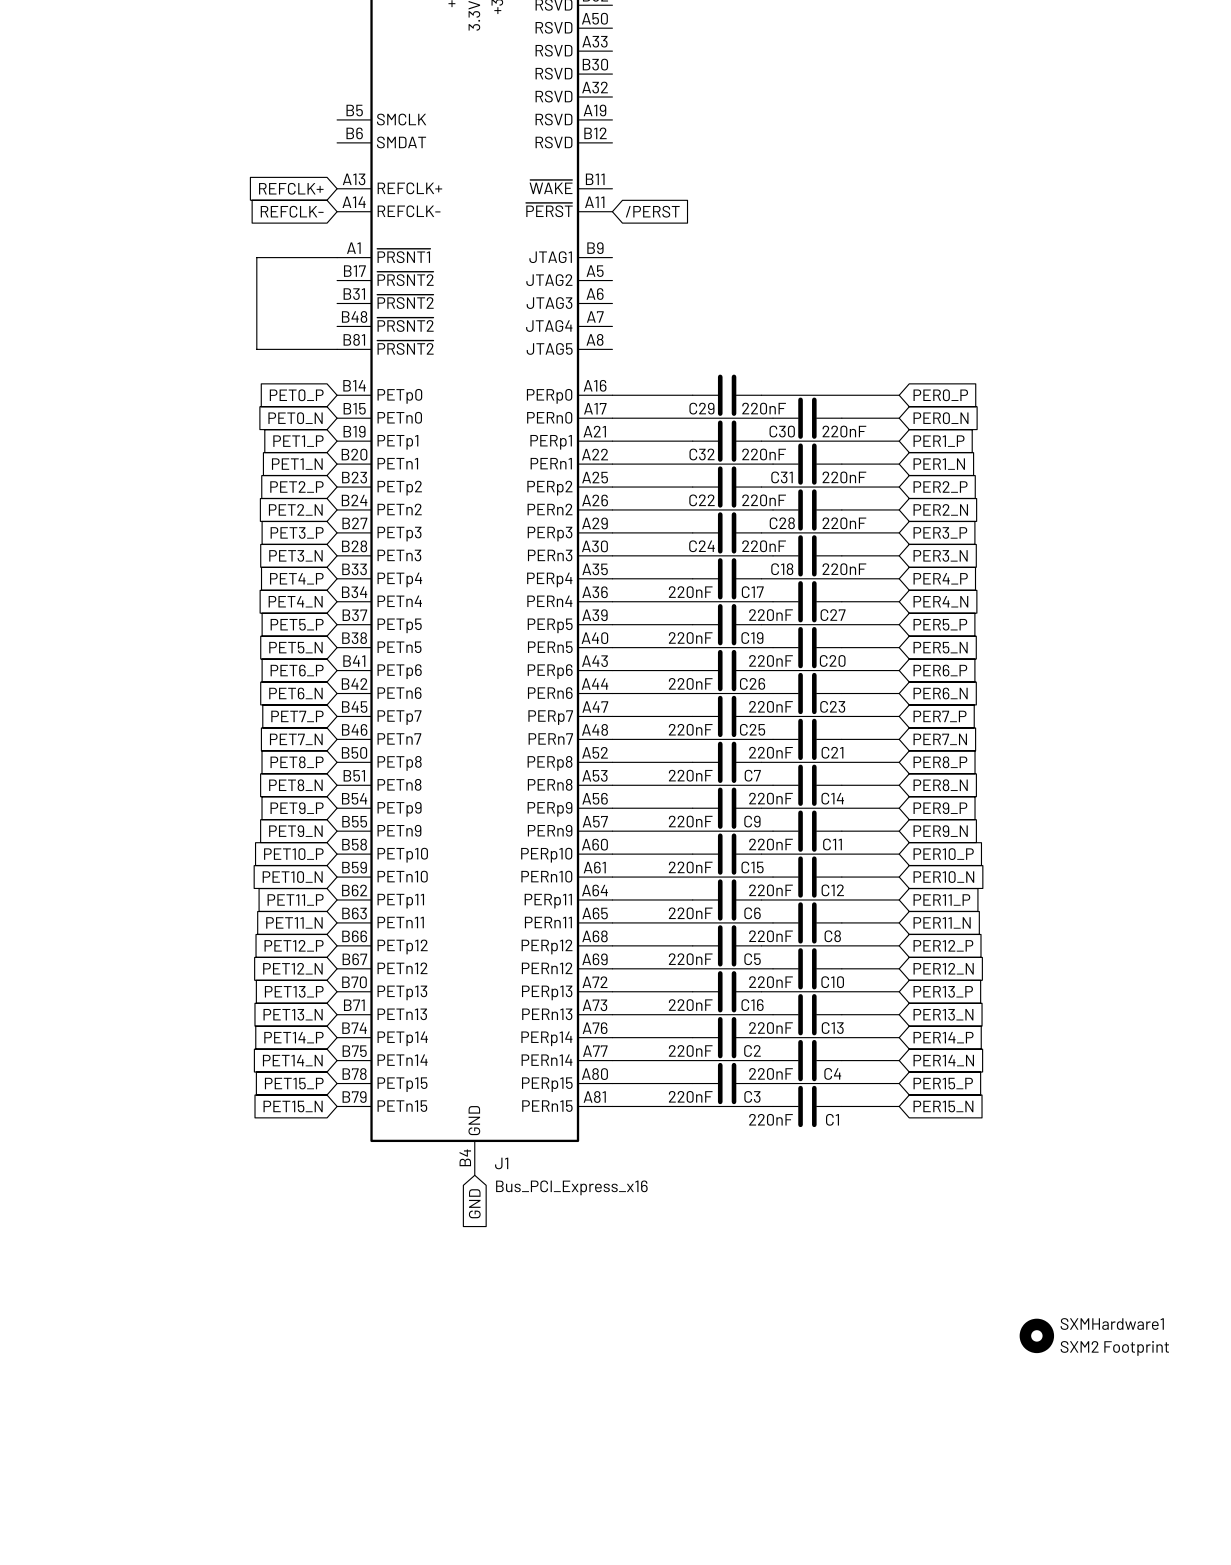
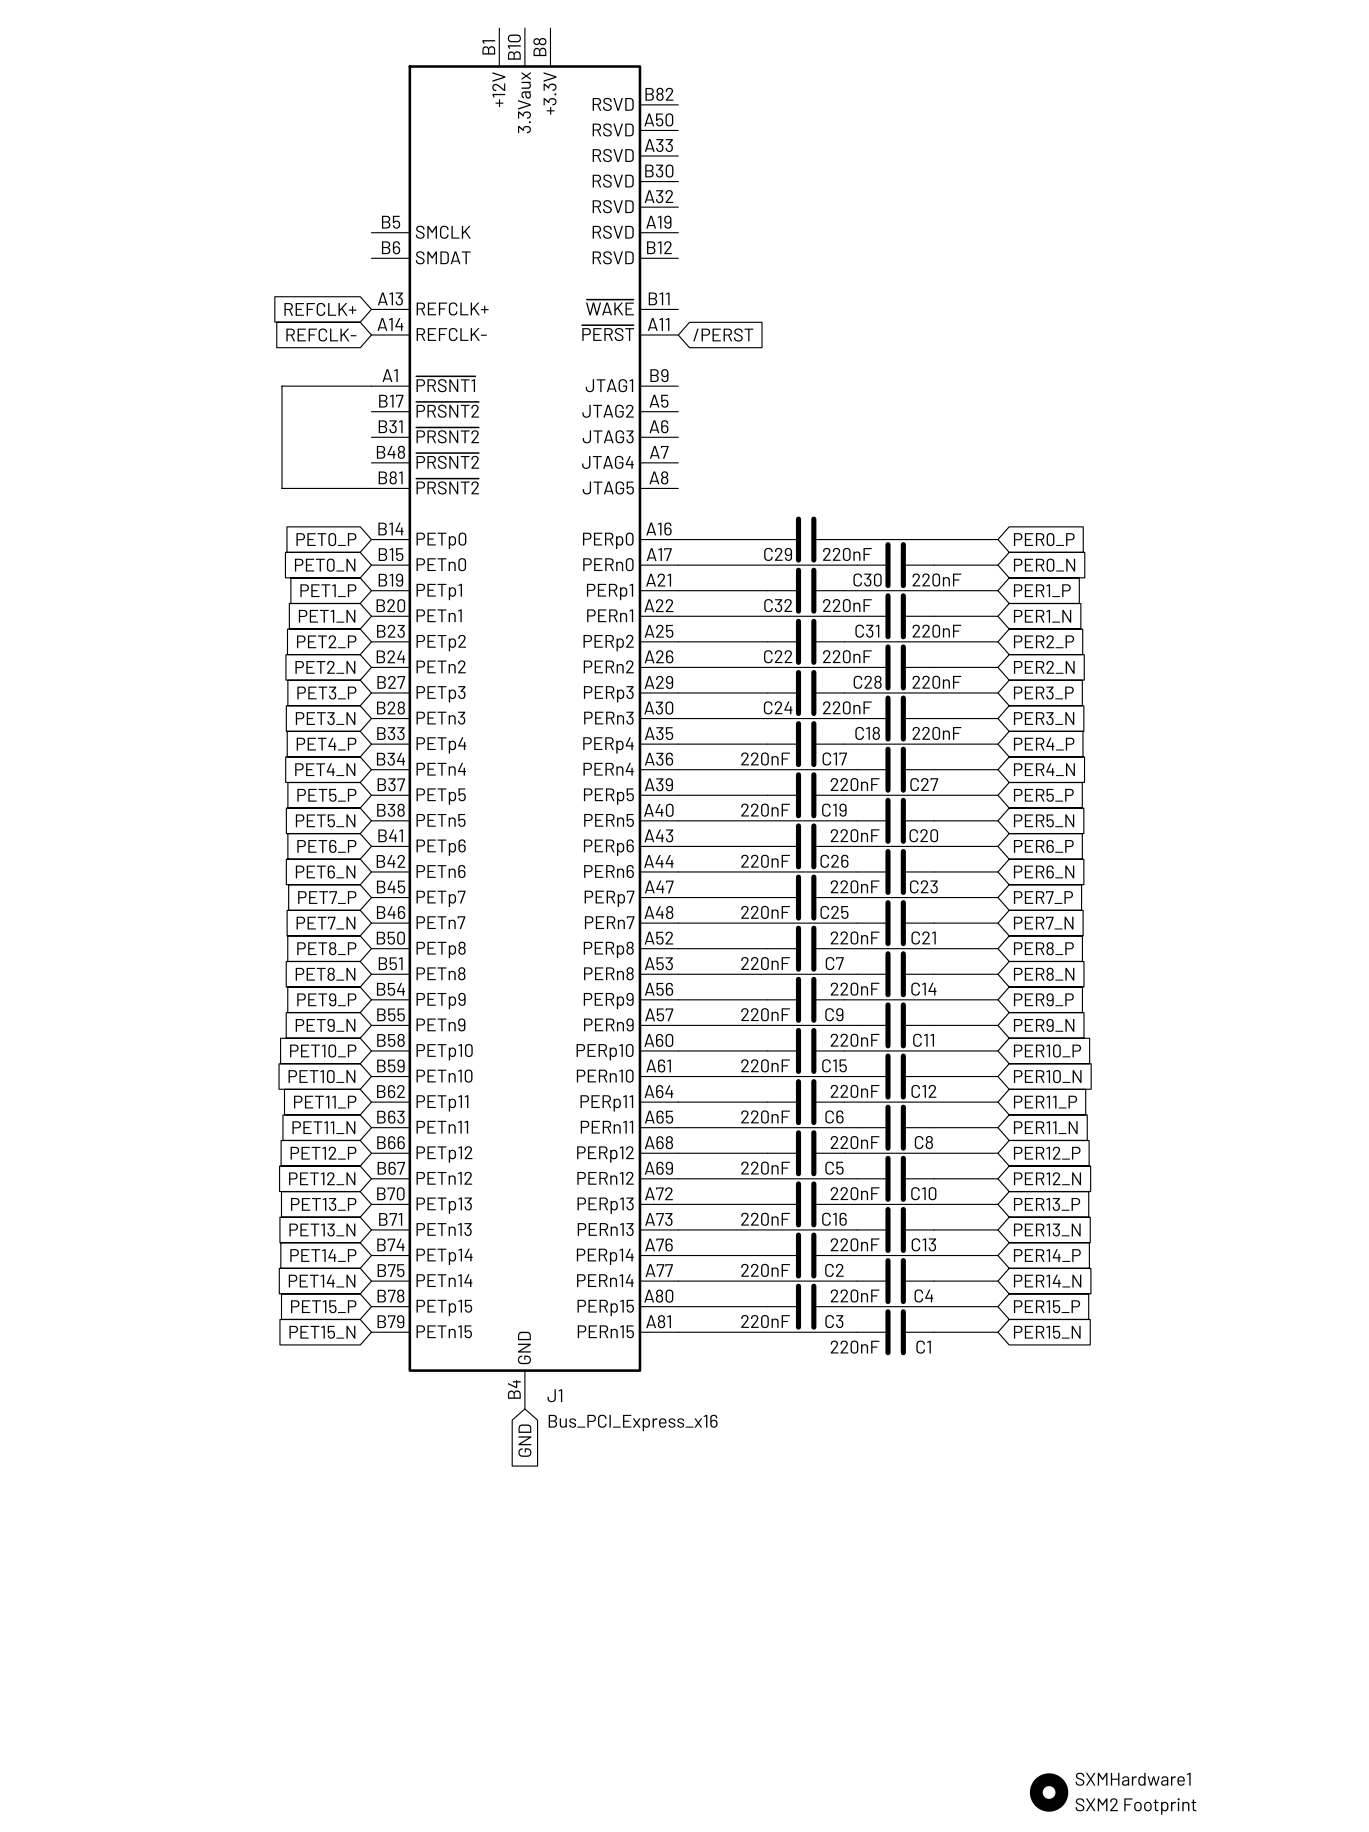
SXMHardware1 position: (1036, 1335) -> (1049, 1792)

